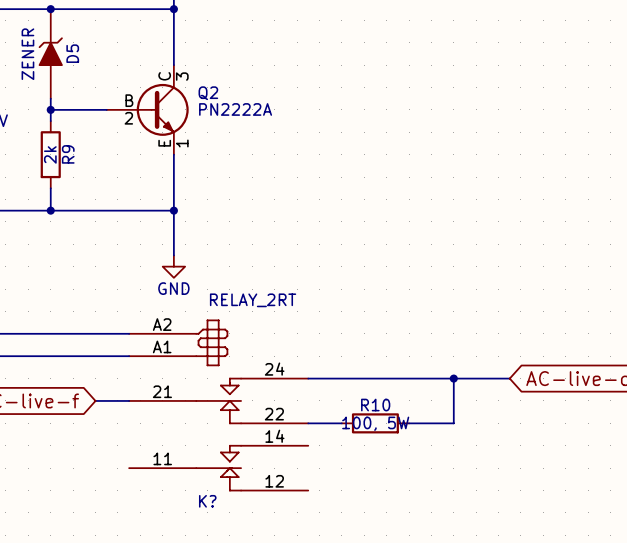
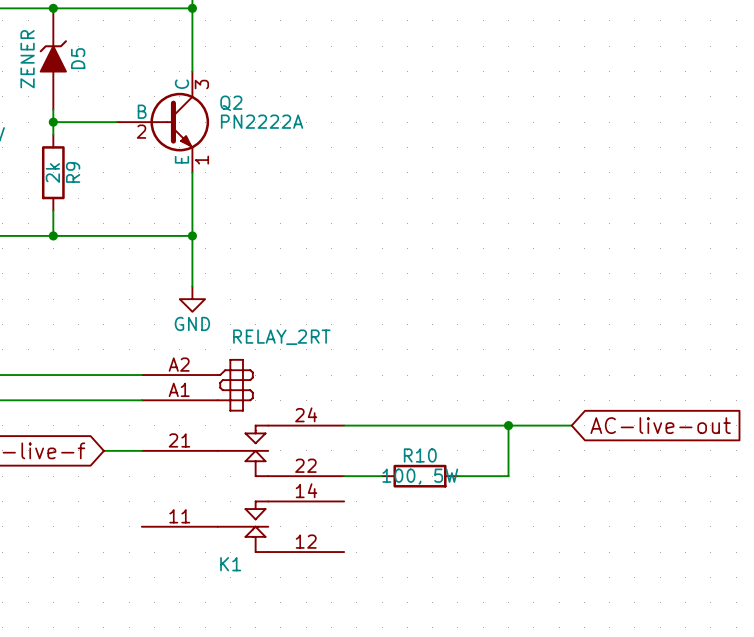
K? name: K? (207, 501) -> K1 (230, 564)

